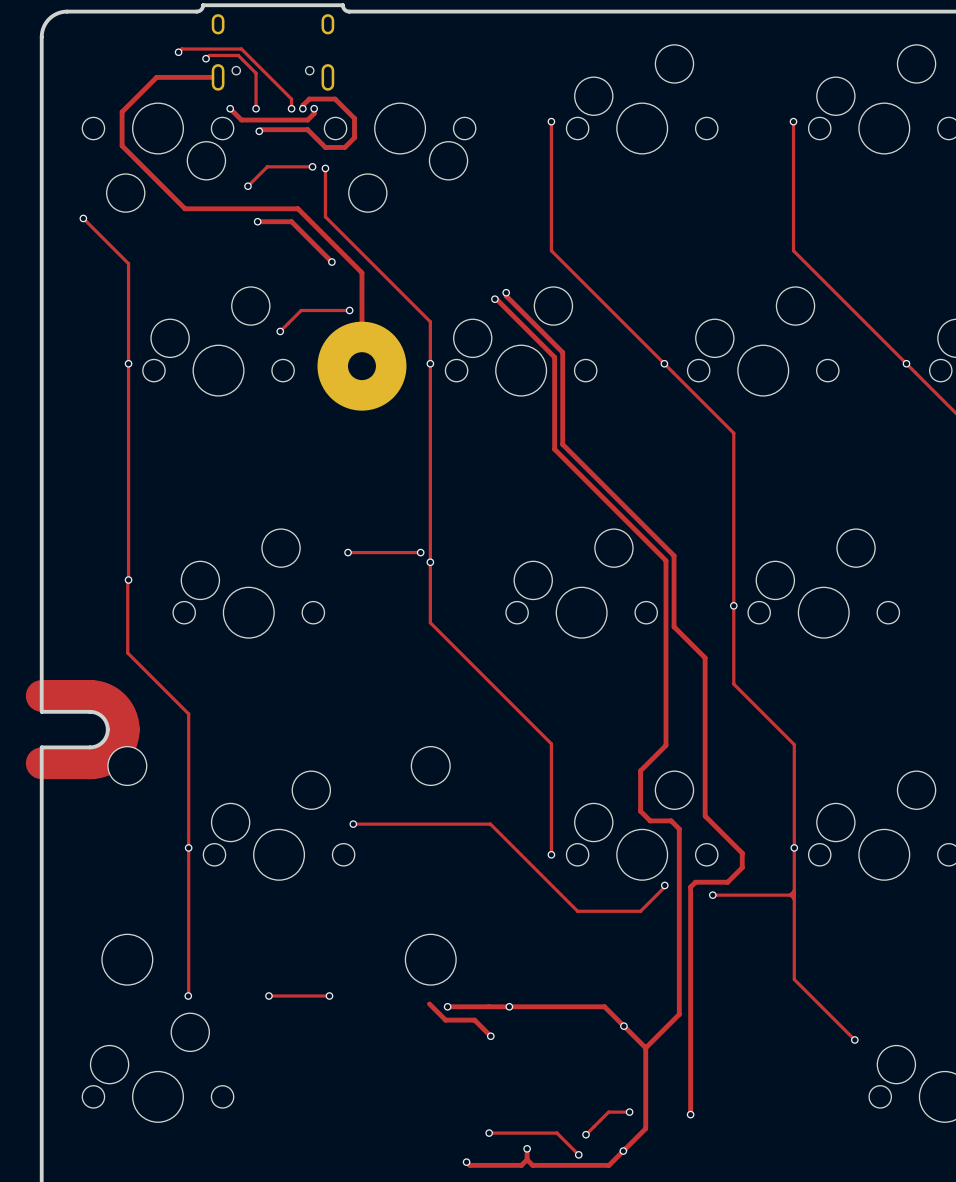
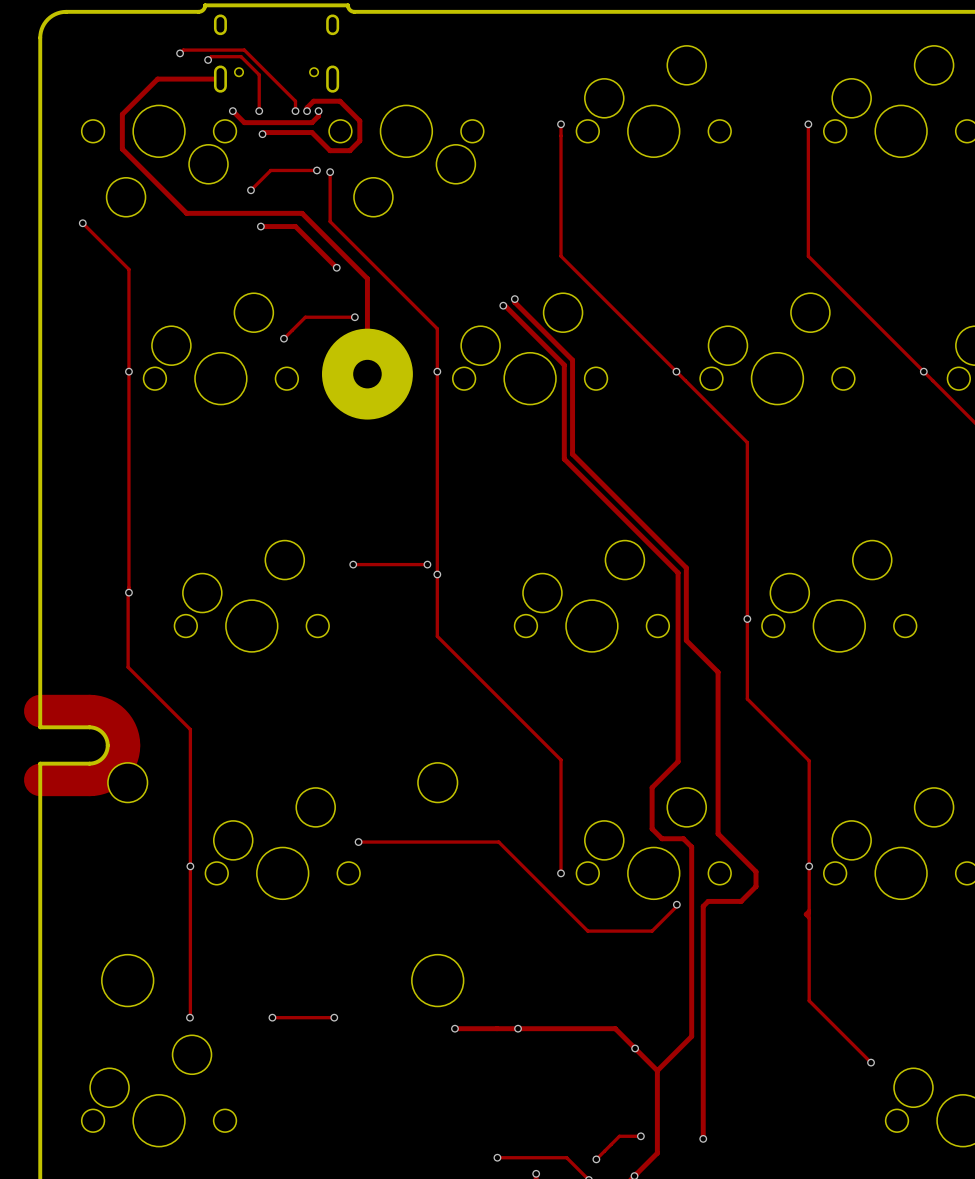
track: (794, 894) (712, 895) -> none
via: (712, 895) -> none
track: (429, 1003) (445, 1020) (474, 1020) (490, 1036) -> none
via: (490, 1036) -> none

